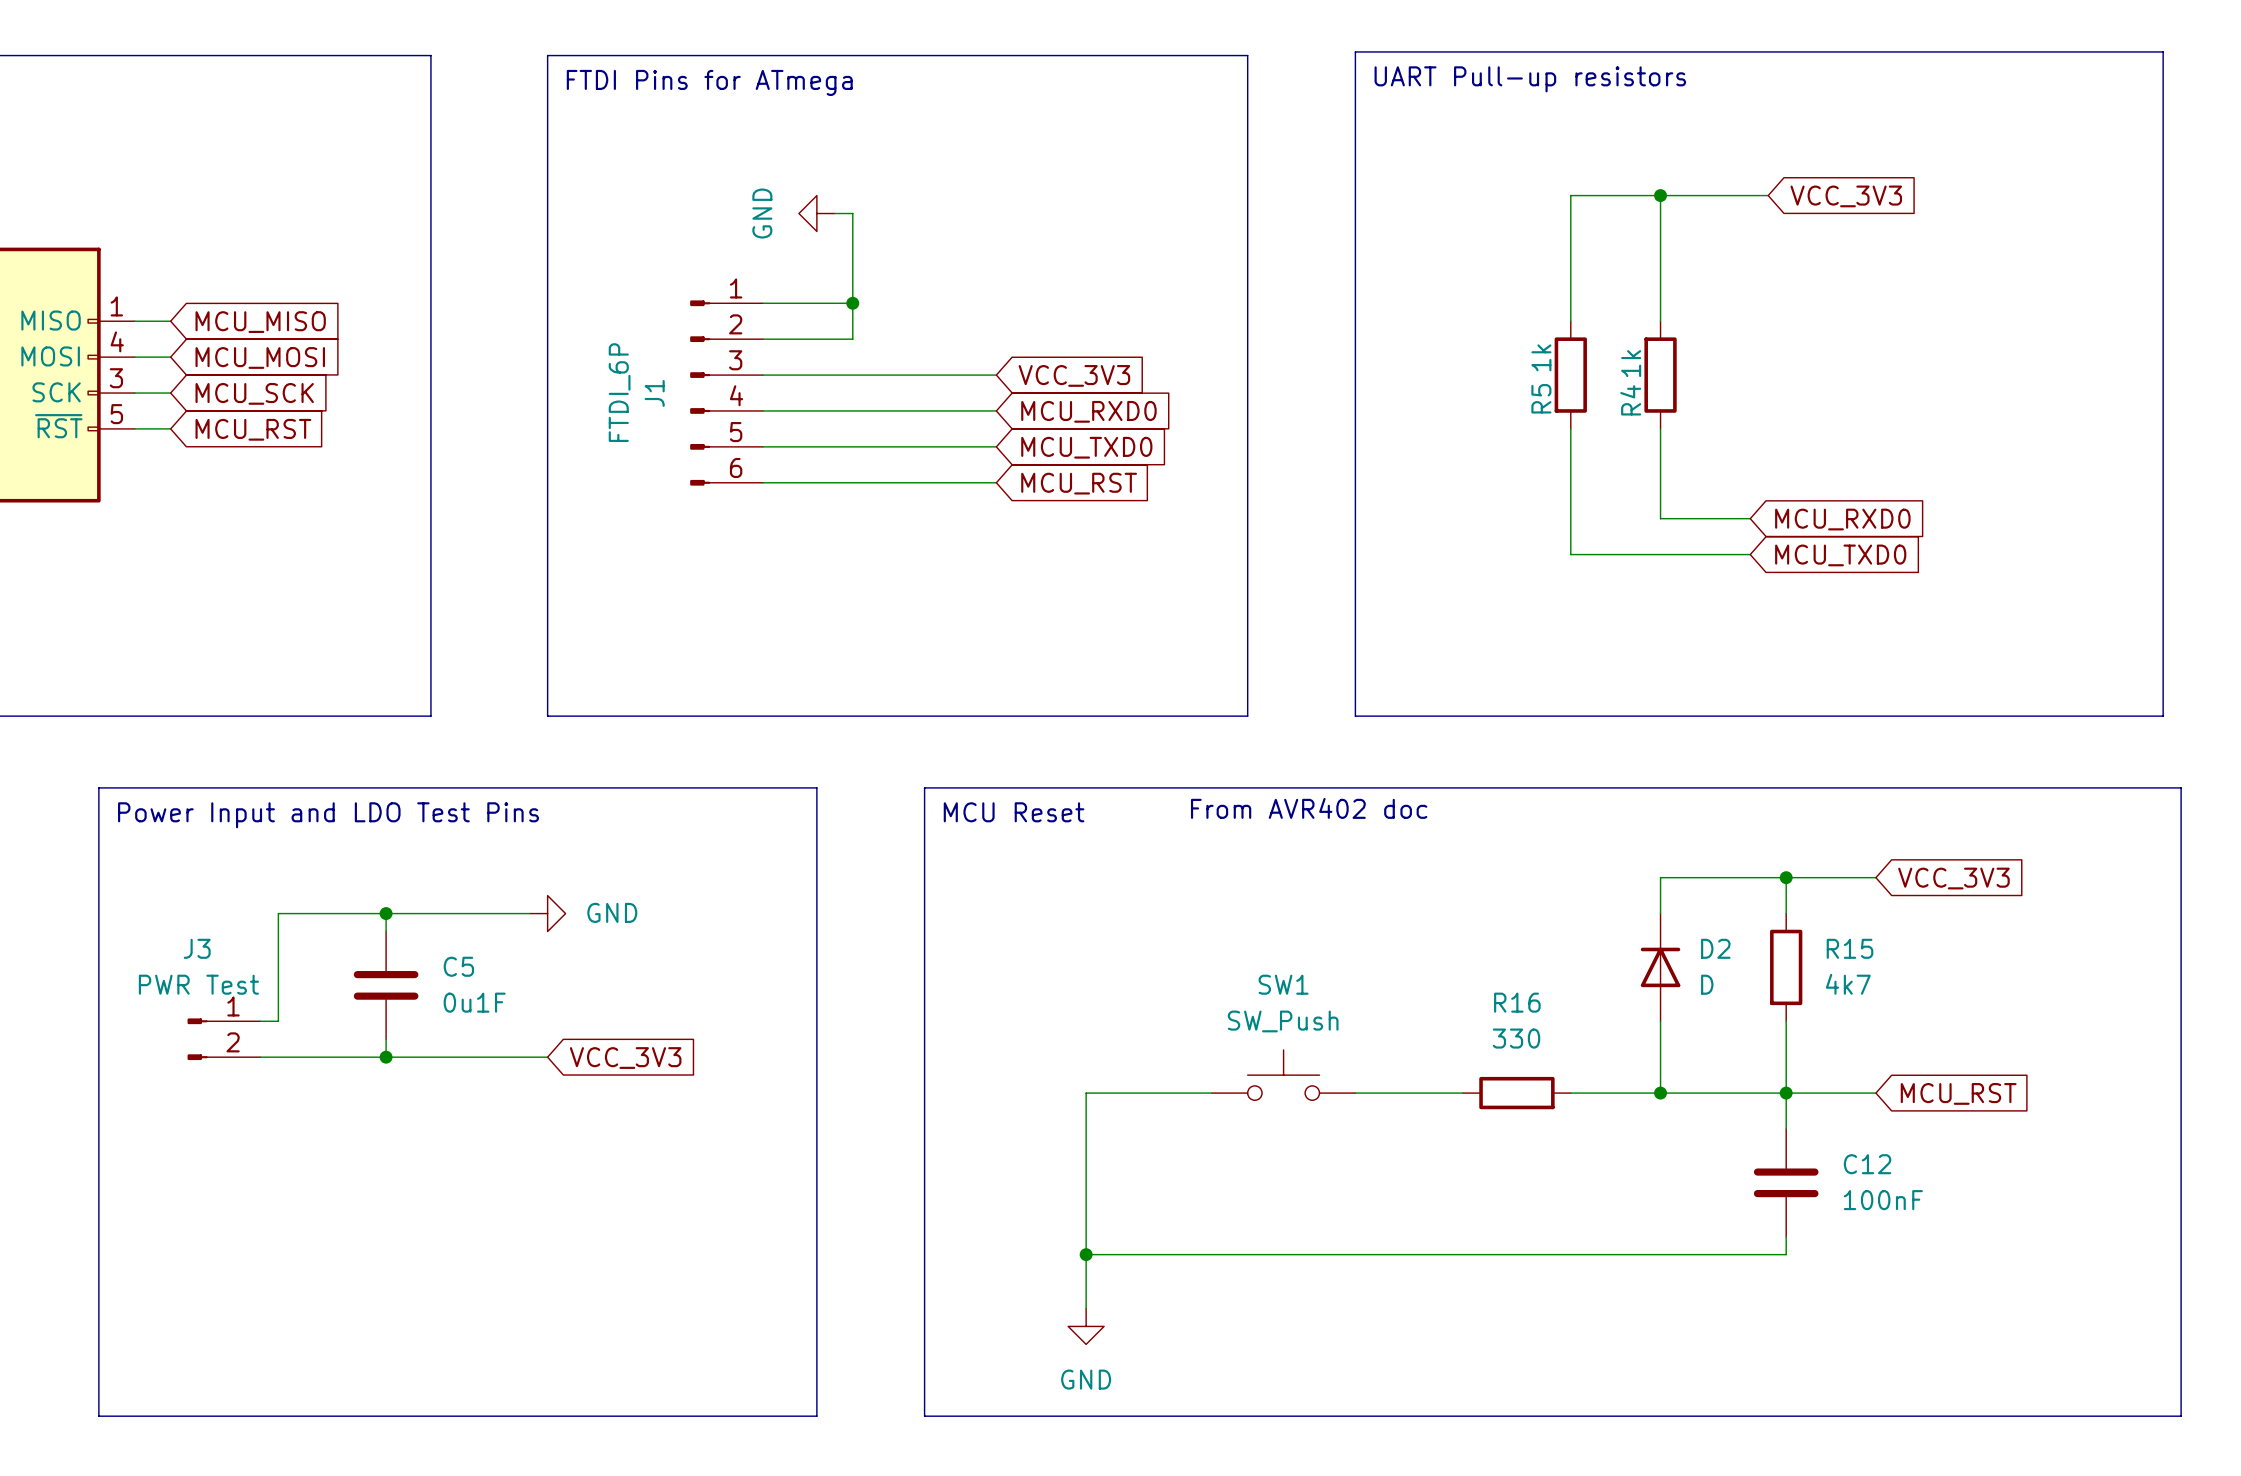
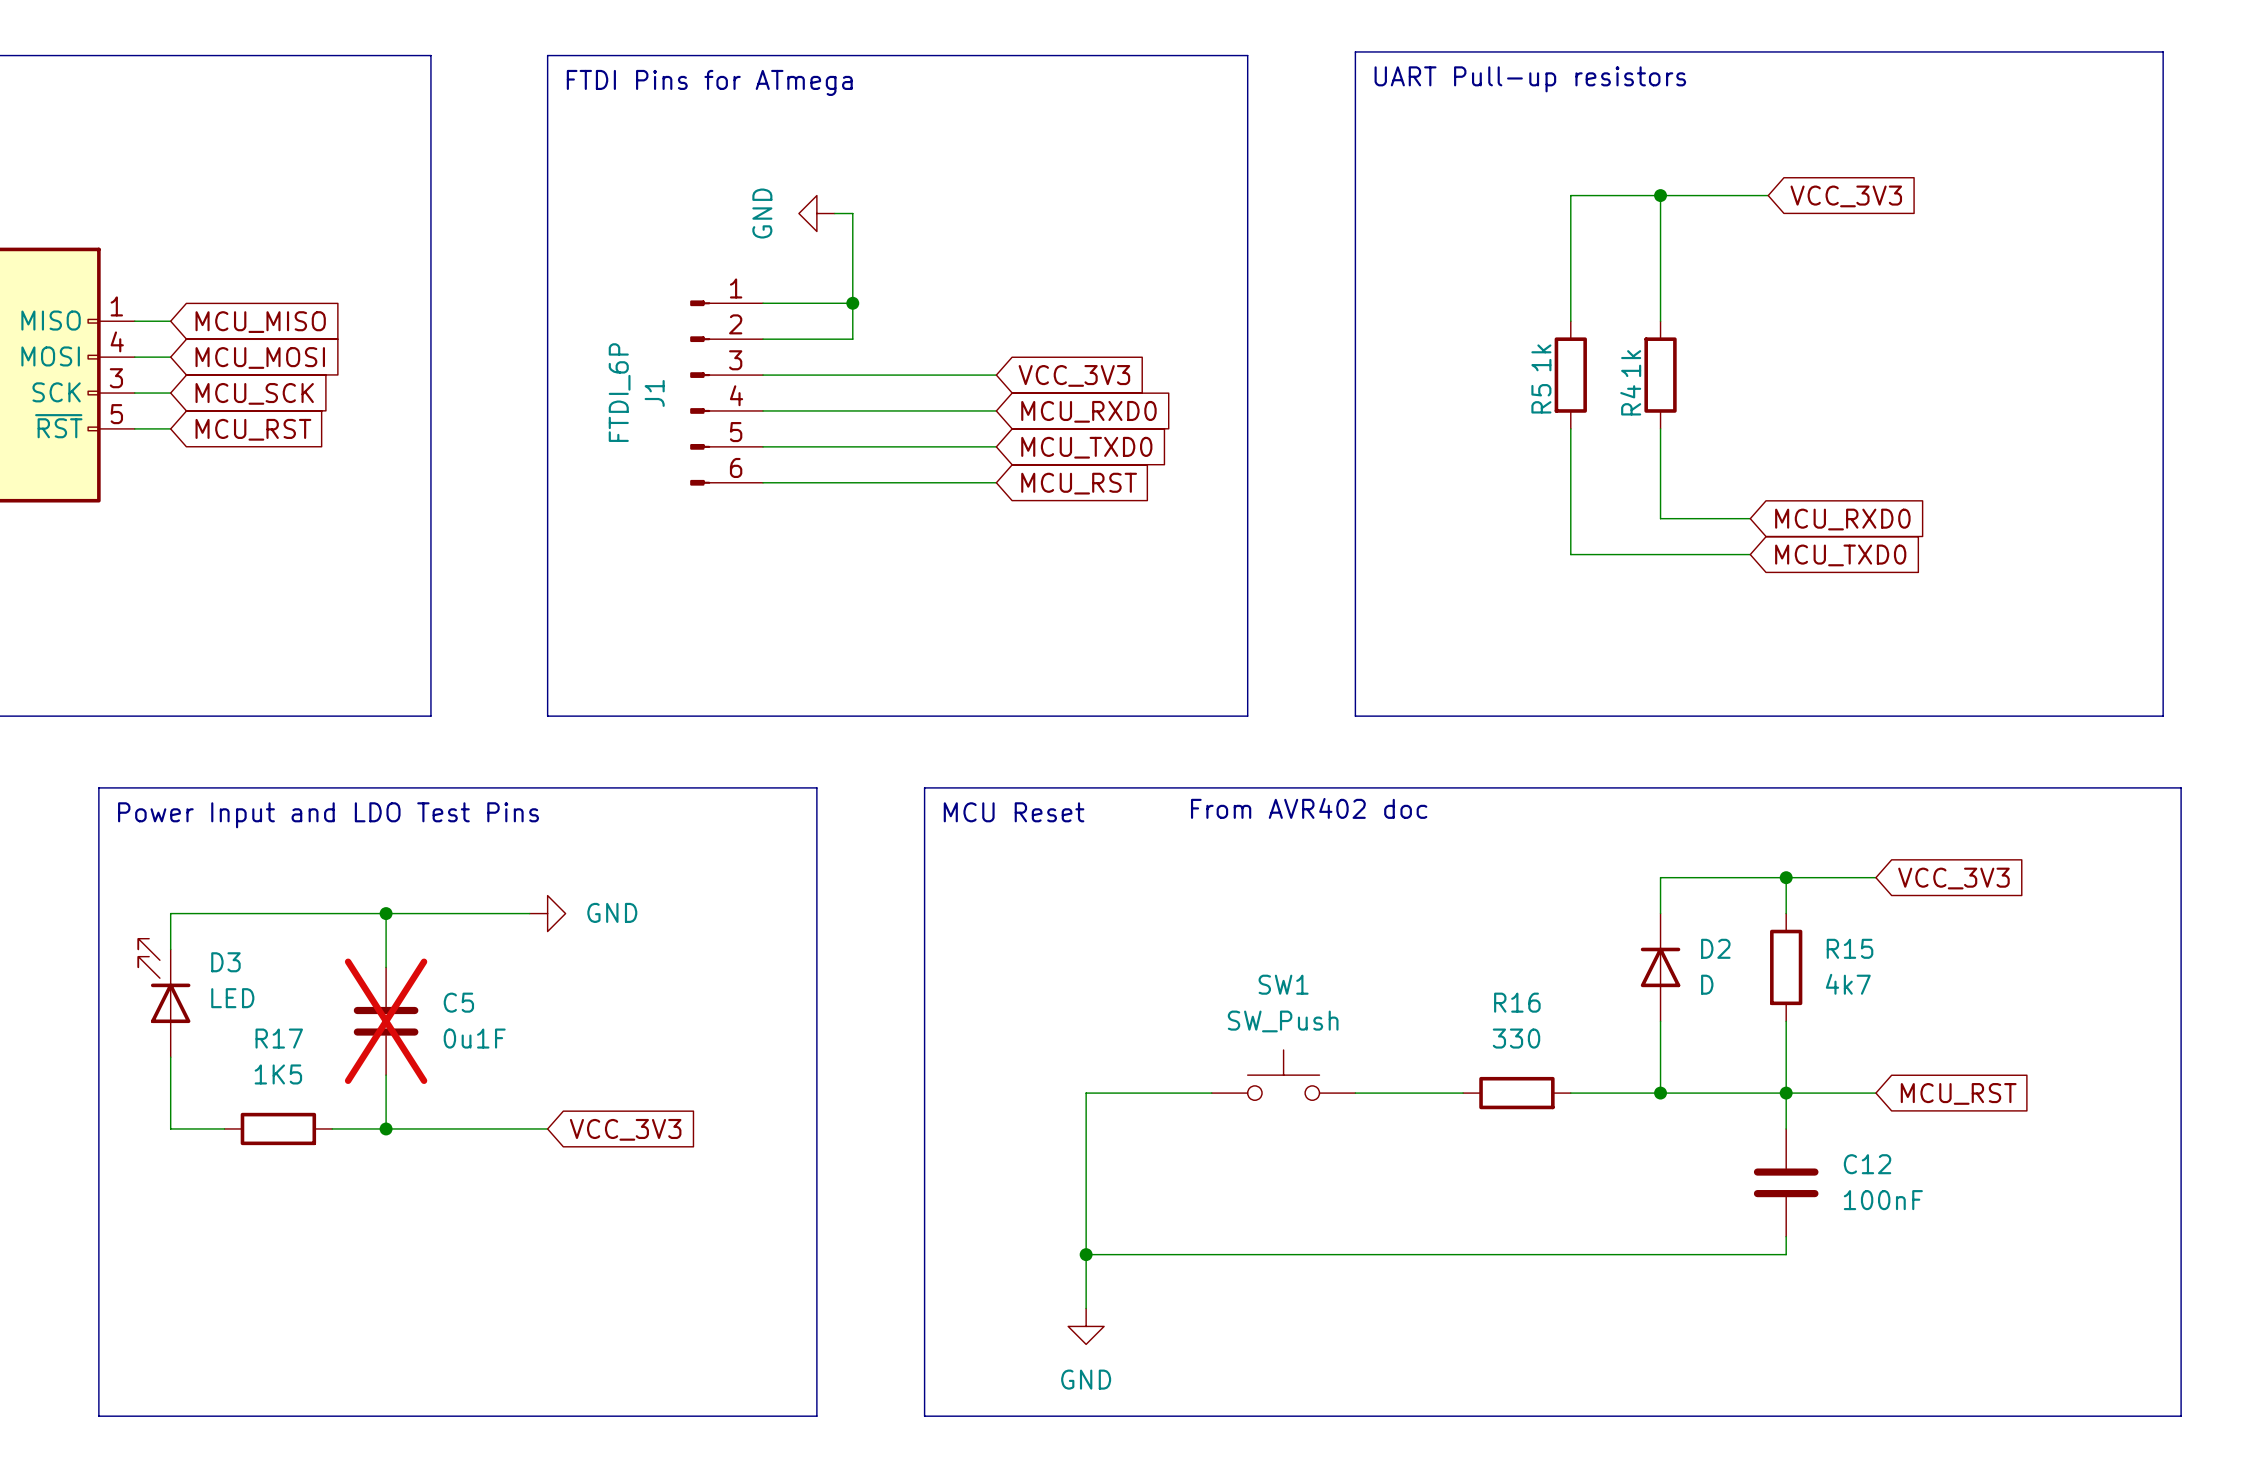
wire: (278, 913) (278, 1021) (260, 1021) -> (278, 913) (170, 913) (170, 949)
C5 position: (386, 985) -> (386, 1021)
D3: none -> LED (164, 997)
C5 do-not-place cross: none -> (386, 1021)
J3: PWR Test (223, 1039) -> none
wire: none -> (170, 1057) (170, 1128) (224, 1128)
wire: (260, 1057) (547, 1057) -> none
junction position: (386, 1057) -> (386, 1128)
global label position: VCC_3V3 (625, 1058) -> VCC_3V3 (625, 1129)
wire: none -> (386, 1075) (386, 1128)
R17: none -> 1K5 (278, 1128)
wire: none -> (332, 1128) (547, 1128)

